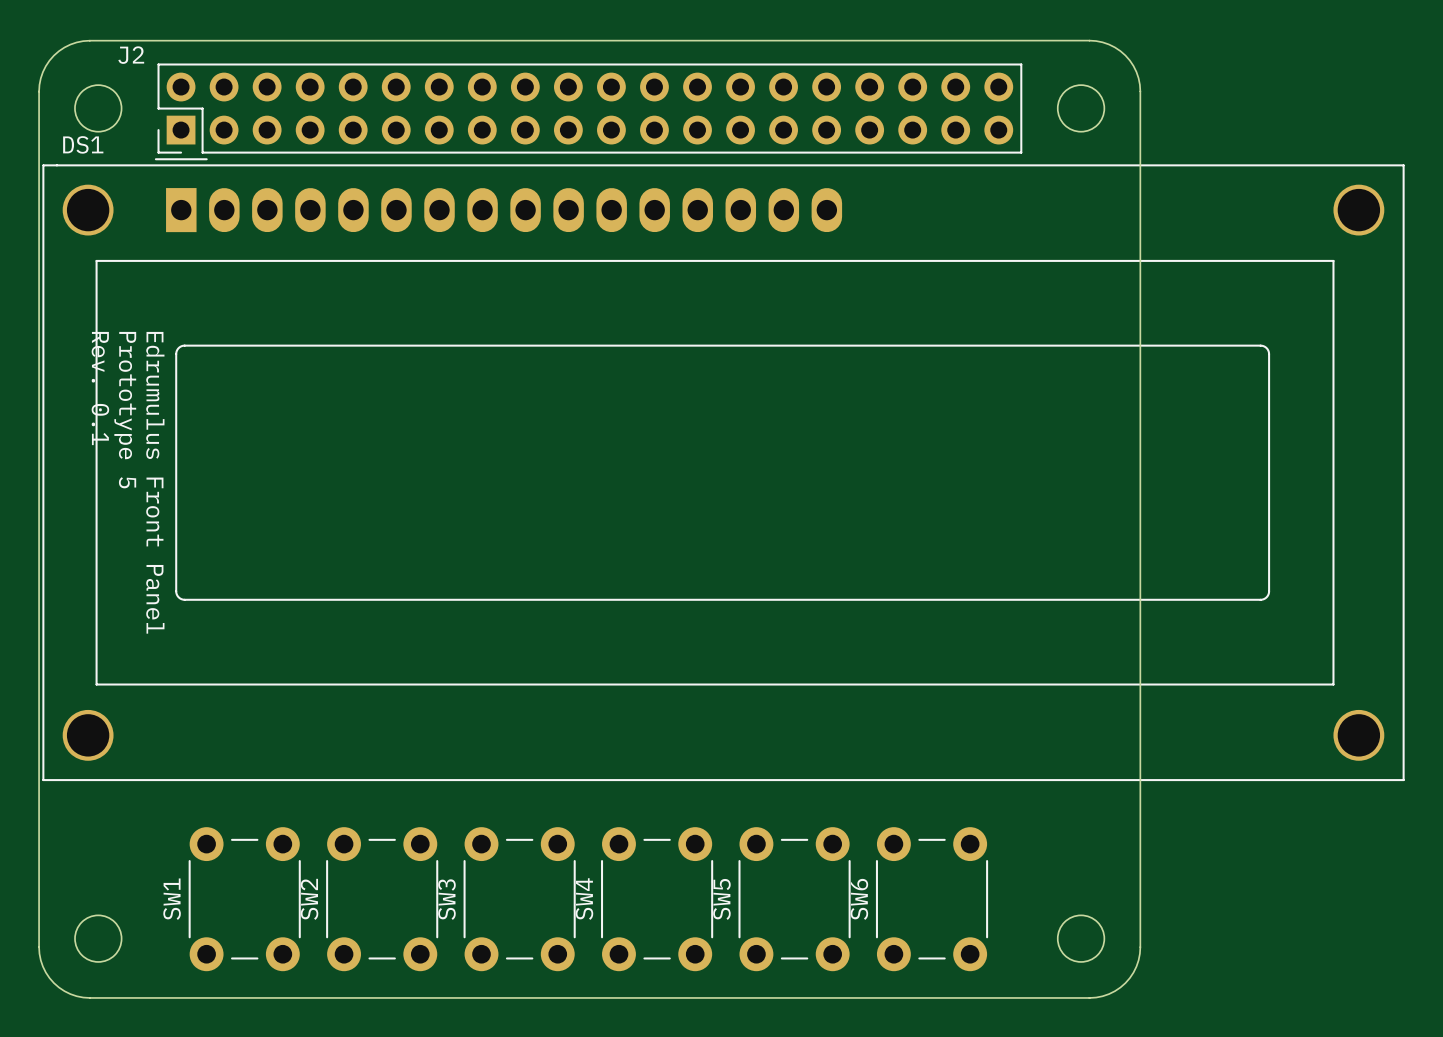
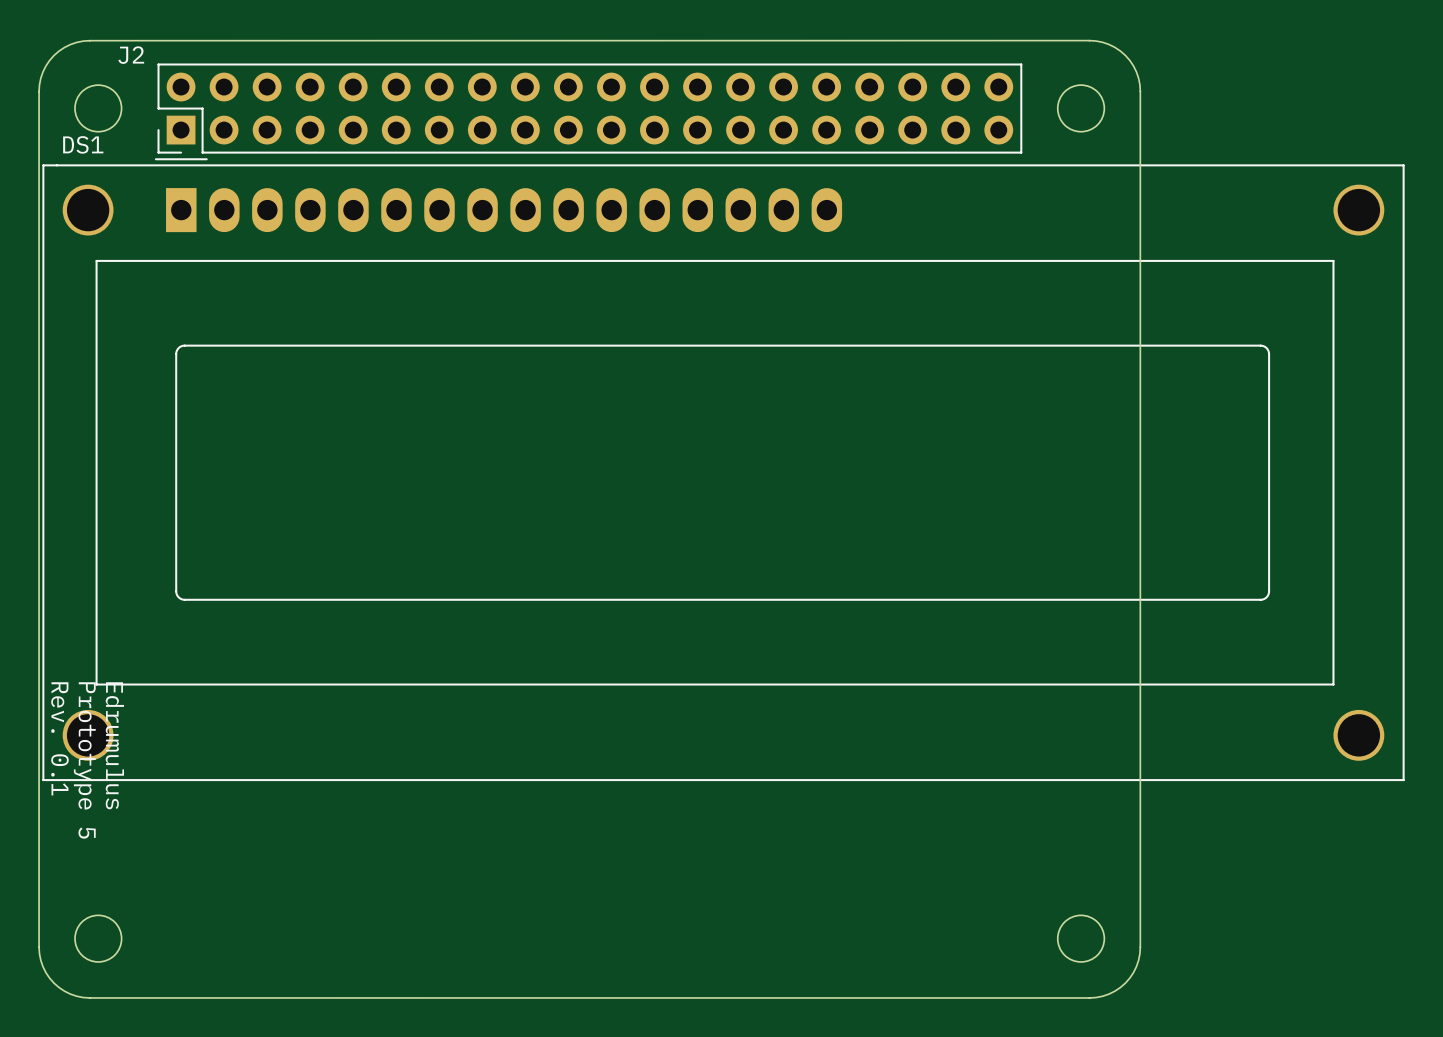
text position: Rev. 0.1 (100, 388) -> Rev. 0.1 (59, 738)
text position: Prototype 5 (125, 410) -> Prototype 5 (84, 760)
text: Edrumulus Front Panel (155, 482) -> none
text: none -> Edrumulus (114, 745)
SW1: (244, 899) -> none
SW2: (382, 899) -> none
SW3: (519, 899) -> none
SW4: (657, 899) -> none
SW5: (794, 899) -> none
SW6: (932, 899) -> none

